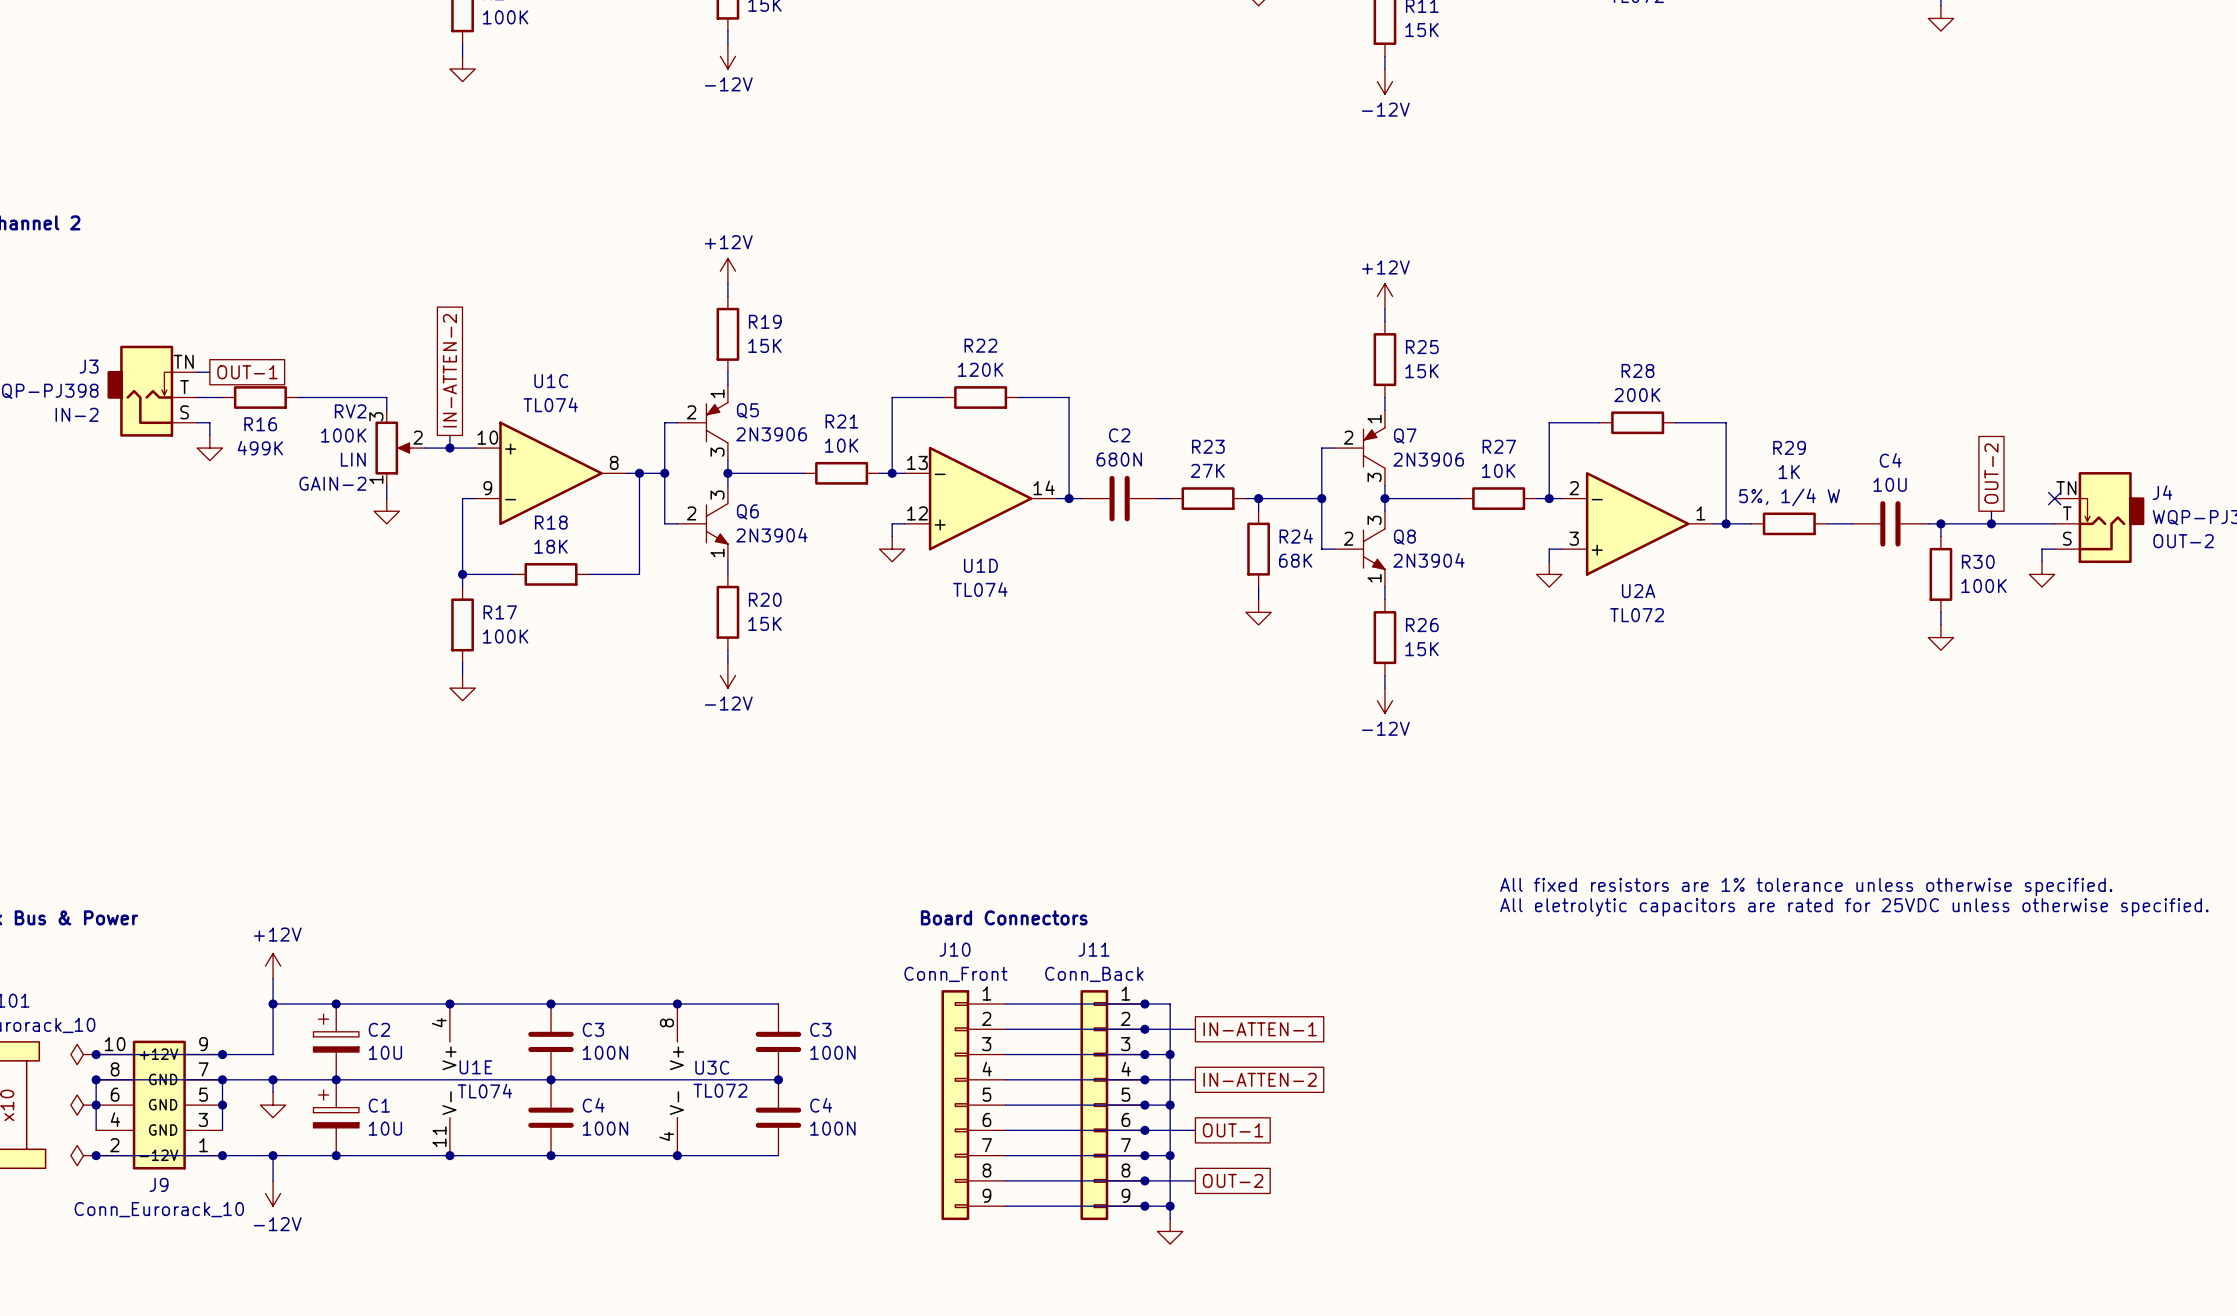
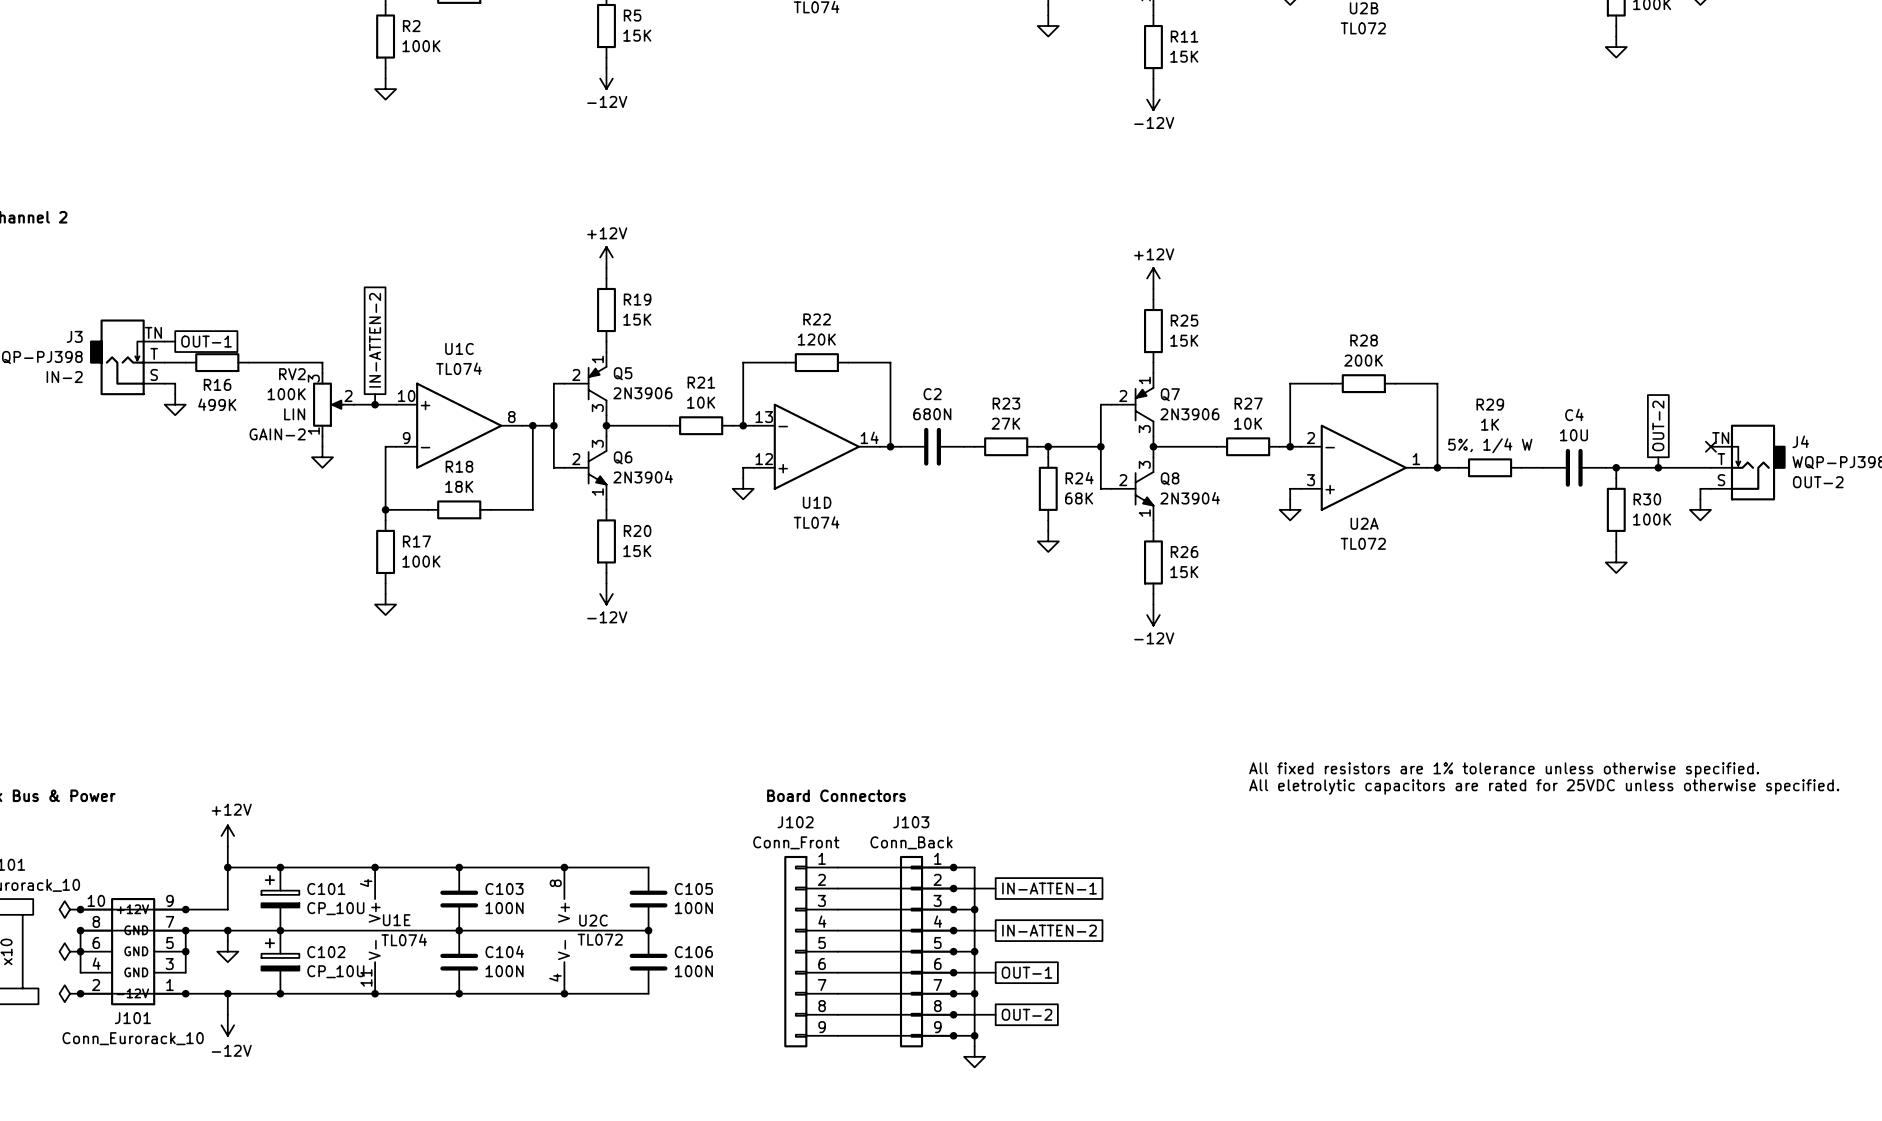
J10 name: J10 (955, 949) -> J102 (795, 822)
J11 name: J11 (1094, 949) -> J103 (911, 822)
C2 name: C2 (379, 1029) -> C101 (326, 888)
C3 name: C3 (593, 1029) -> C103 (504, 888)
C3 name: C3 (820, 1029) -> C105 (693, 888)
C2 value: 10U (385, 1052) -> CP_10U (335, 908)
U3C name: U3C (712, 1067) -> U2C (593, 920)
C1 name: C1 (379, 1105) -> C102 (326, 952)
C4 name: C4 (593, 1105) -> C104 (504, 951)
C4 name: C4 (821, 1105) -> C106 (693, 952)
C1 value: 10U (385, 1128) -> CP_10U (335, 971)
J9 name: J9 (159, 1184) -> J101 (132, 1018)

